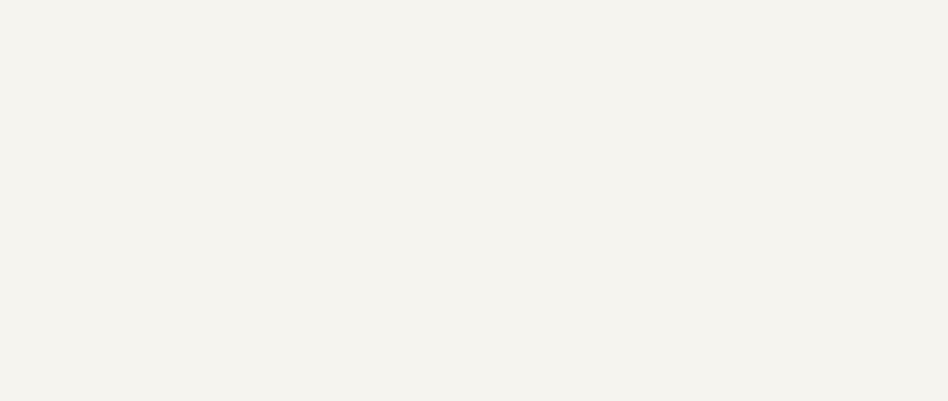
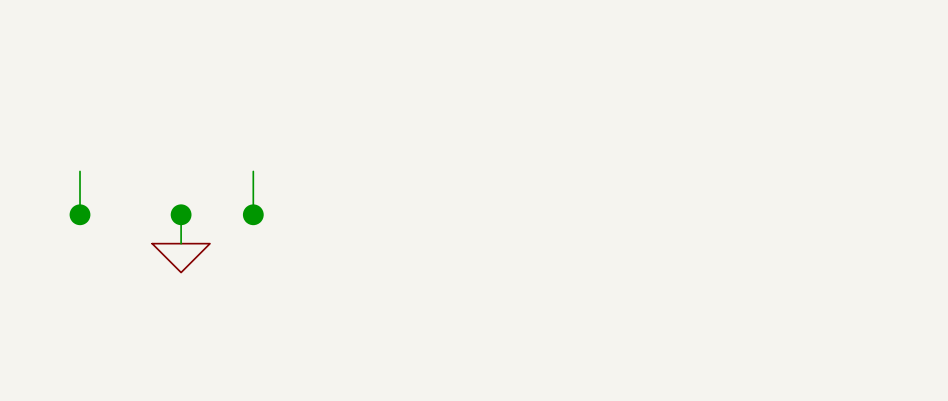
wire: none -> (80, 171) (80, 214)
wire: none -> (253, 171) (253, 214)
junction: none -> (80, 214)
wire: none -> (181, 214) (181, 243)
junction: none -> (181, 214)
junction: none -> (253, 214)
power symbol: none -> (181, 258)

